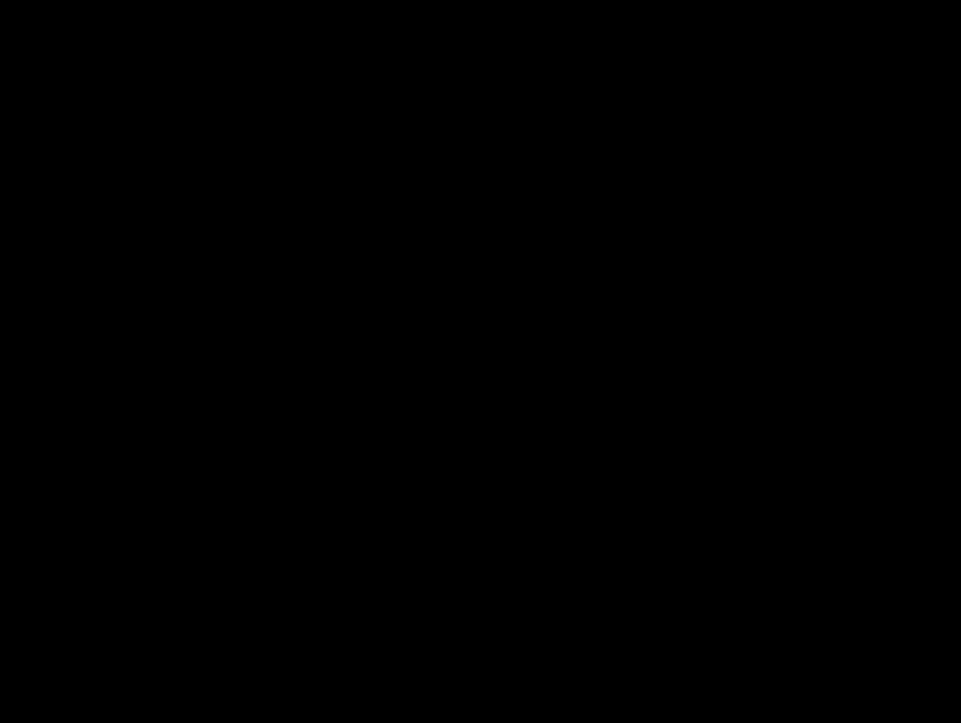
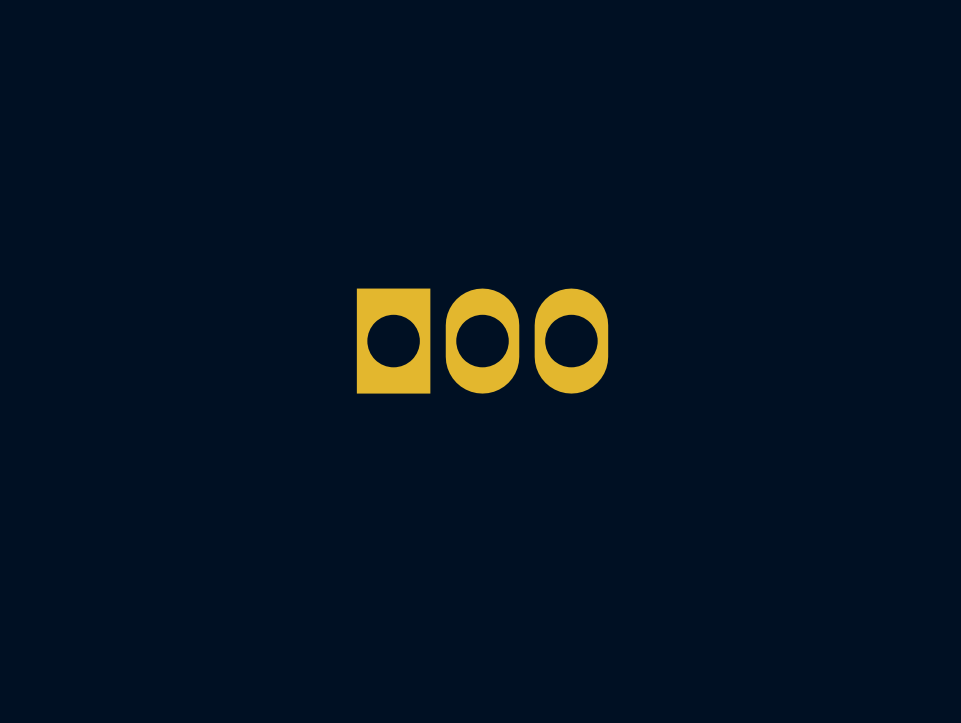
part: none -> (482, 341)

